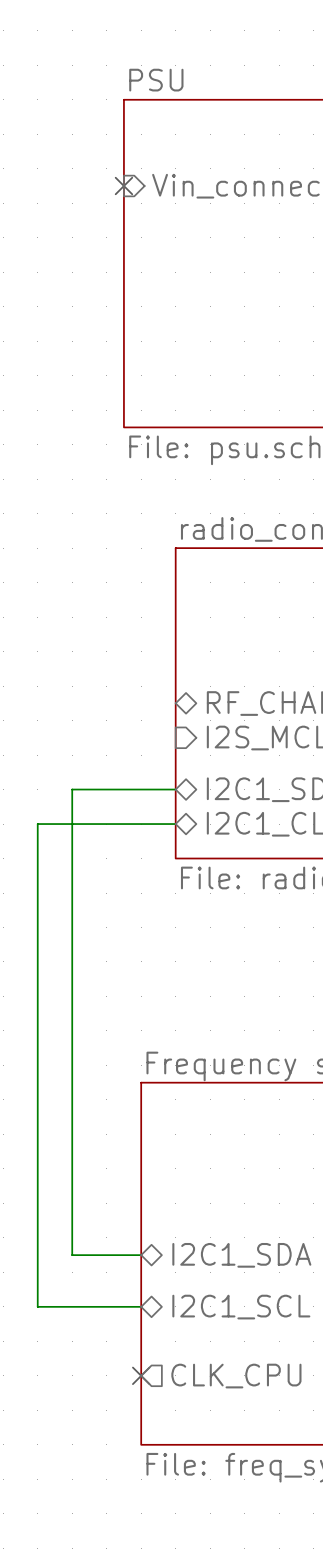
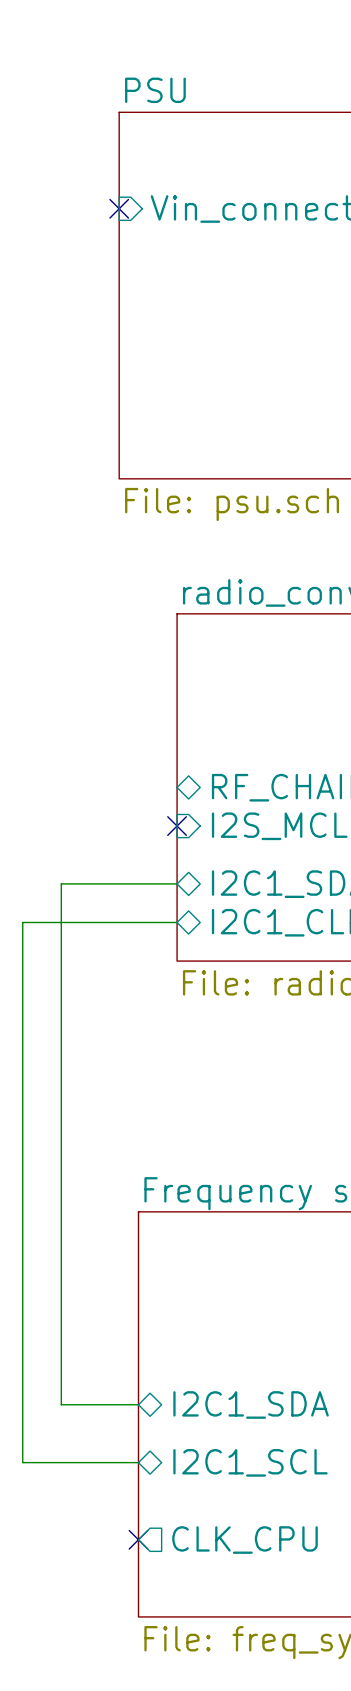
no-connect mark: none -> (177, 826)

